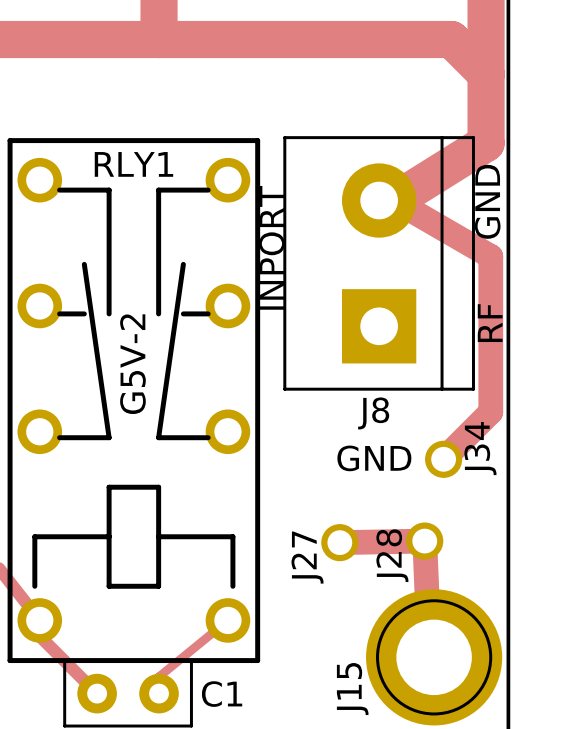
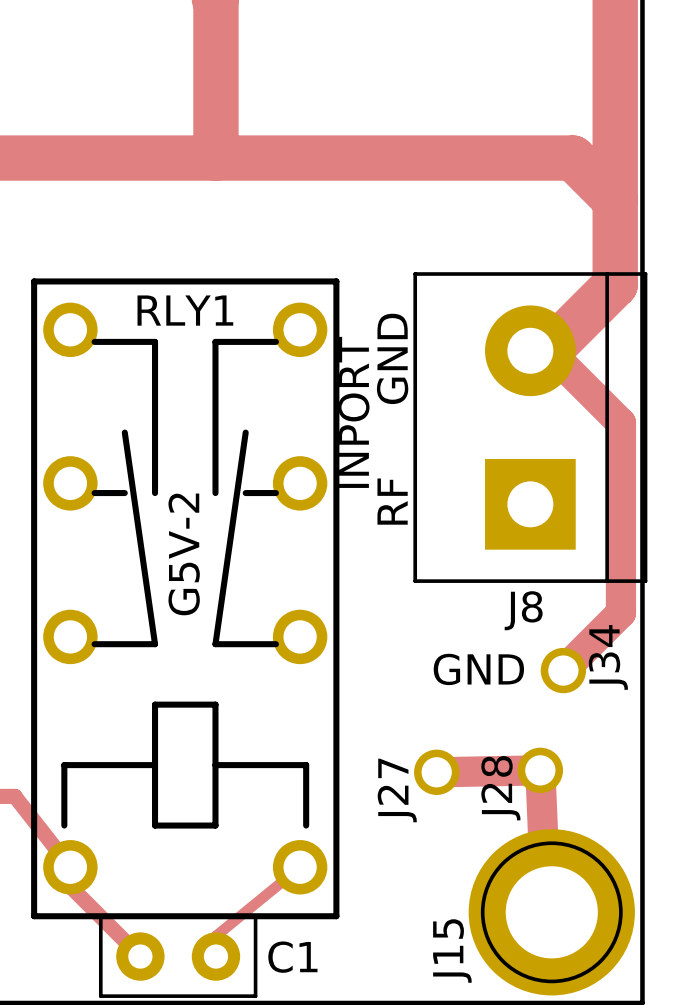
track: (486, 143) (394, 200) (379, 200) (394, 200) (490, 256) -> (615, 284) (549, 350) (530, 350) (548, 350) (620, 422)
text position: GND (487, 201) -> GND (392, 358)
J8 position: (379, 263) -> (530, 427)
text position: RF (490, 323) -> RF (392, 501)

